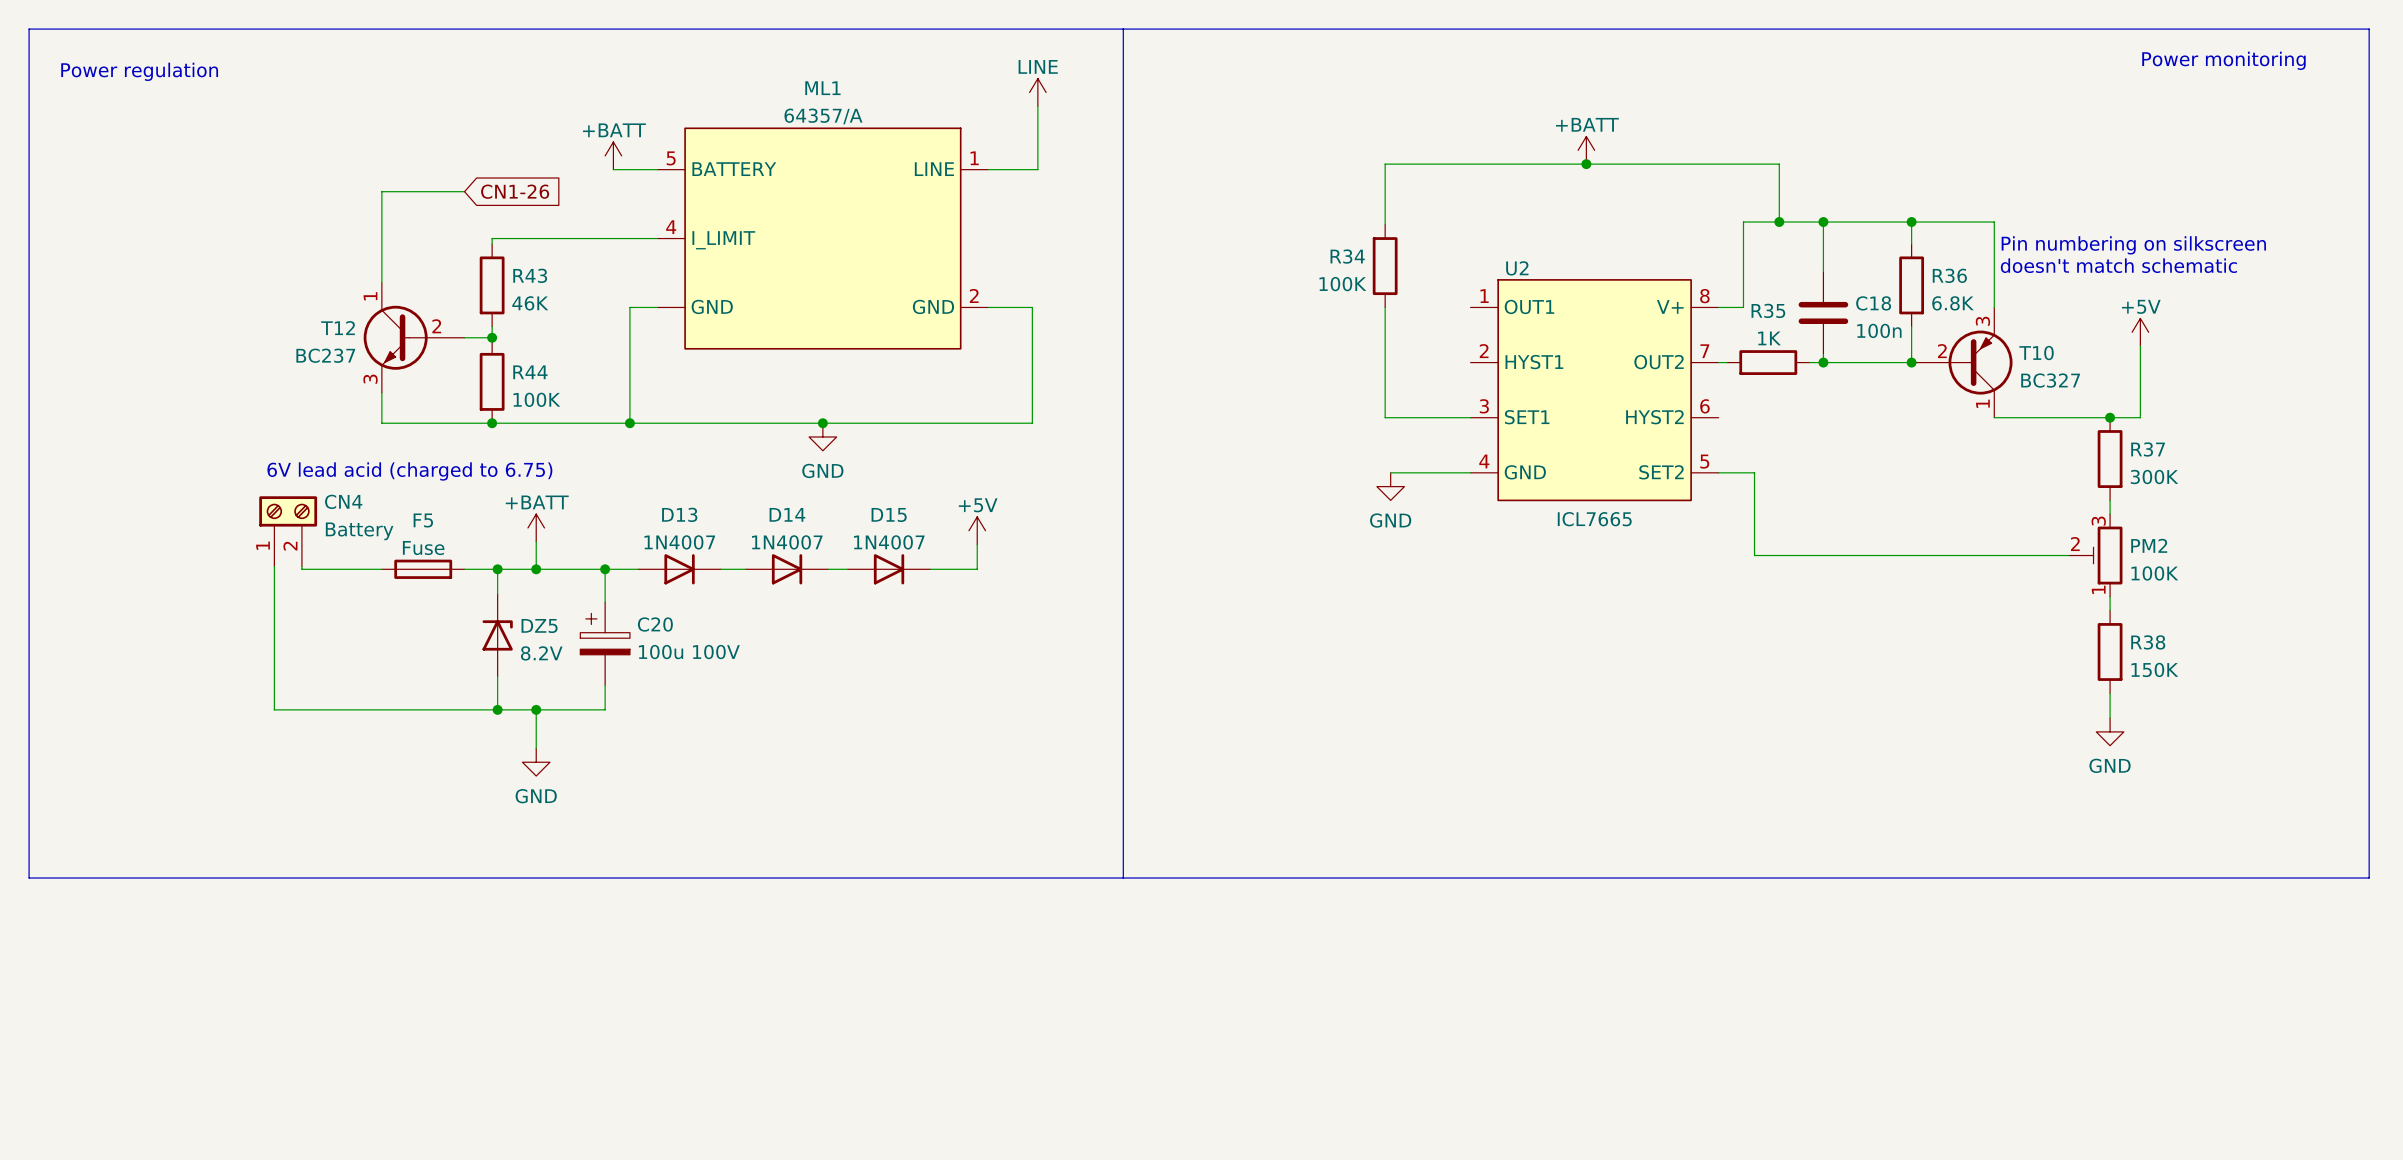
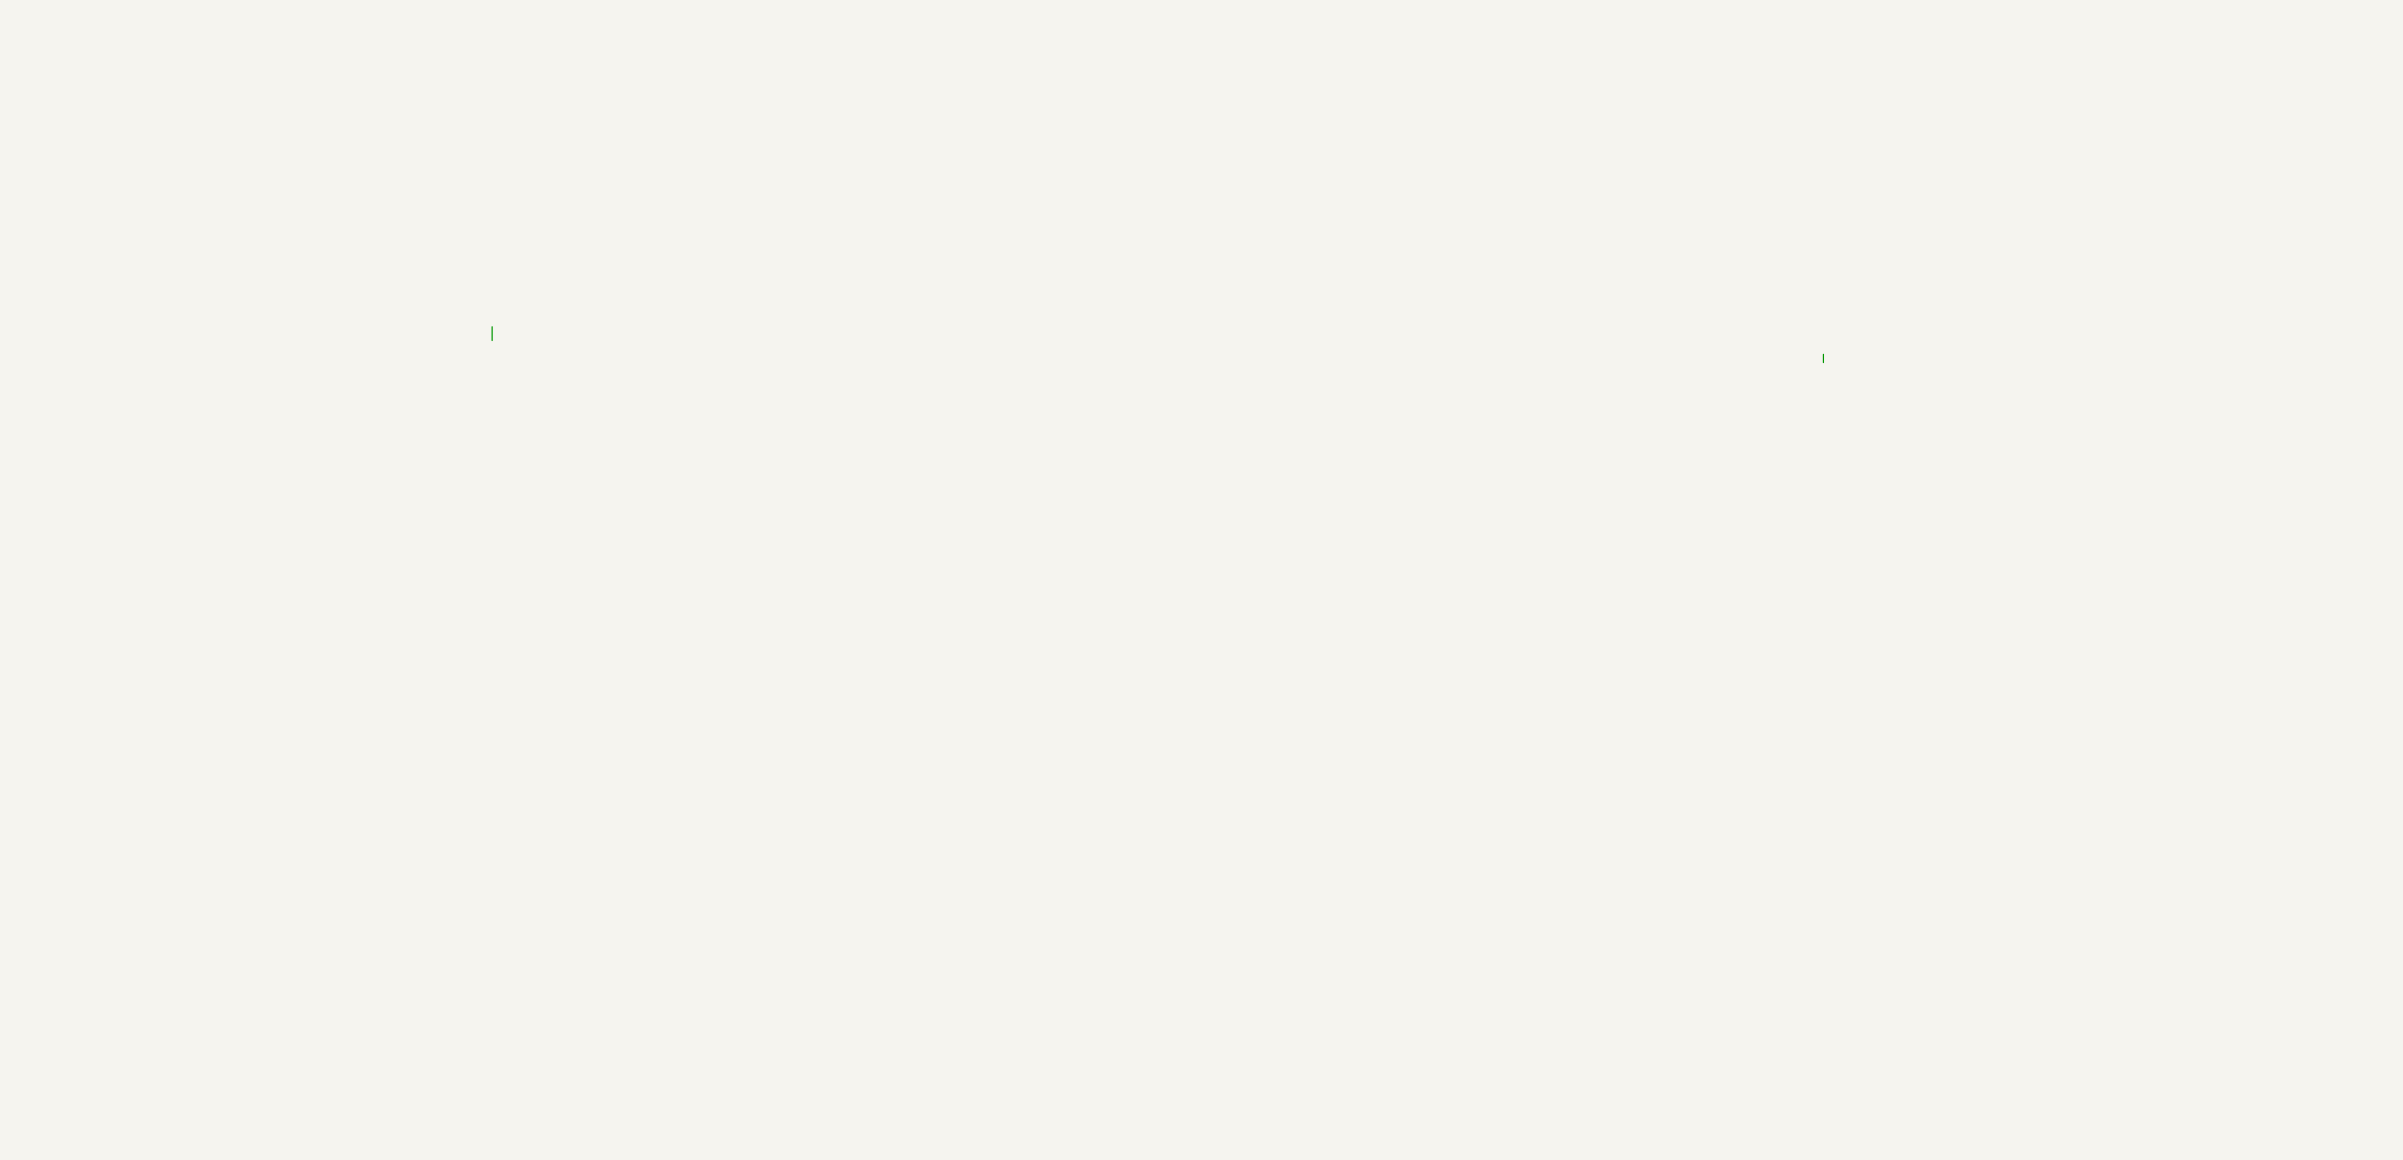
line: (29, 29) (2369, 29) (2369, 878) (29, 878) (29, 29) -> none
line: (1123, 29) (1123, 878) -> none
text: Power monitoring (2223, 60) -> none
text: Power regulation (139, 71) -> none
power symbol: LINE (1037, 92) -> none
wire: (1037, 106) (1037, 169) (988, 169) -> none
power symbol: +BATT (1586, 150) -> none
power symbol: +BATT (613, 155) -> none
junction: (1586, 164) -> none
wire: (613, 169) (657, 169) -> none
wire: (464, 191) (381, 191) (381, 282) -> none
global label: CN1-26 (515, 191) -> none
wire: (1779, 222) (1779, 164) (1385, 164) (1385, 224) -> none
junction: (1779, 222) -> none
wire: (1823, 222) (1823, 271) -> none
junction: (1823, 222) -> none
wire: (1911, 222) (1911, 244) -> none
junction: (1911, 222) -> none
wire: (657, 238) (492, 238) (492, 244) -> none
ML1: 64357/A (822, 238) -> none
text: Pin numbering on silkscreen (2133, 245) -> none
text: doesn't match schematic (2118, 265) -> none
R34: 100K (1385, 266) -> none
R43: 46K (492, 285) -> none
R36: 6.8K (1911, 285) -> none
wire: (657, 307) (629, 307) (629, 423) -> none
wire: (988, 307) (1032, 307) (1032, 423) (381, 423) (381, 392) -> none
wire: (1385, 307) (1385, 417) (1470, 417) -> none
wire: (1718, 307) (1743, 307) (1743, 222) (1994, 222) (1994, 307) -> none
C18: 100n (1823, 312) -> none
wire: (1911, 326) (1911, 362) (1809, 362) -> none
power symbol: +5V (2140, 332) -> none
T12: BC237 (414, 337) -> none
wire: (464, 337) (492, 337) -> none
junction: (492, 337) -> none
wire: (2140, 346) (2140, 417) (1994, 417) -> none
wire: (1718, 362) (1726, 362) -> none
R35: 1K (1768, 362) -> none
junction: (1823, 362) -> none
junction: (1911, 362) -> none
T10: BC327 (1962, 362) -> none
R44: 100K (492, 381) -> none
U2: ICL7665 (1594, 390) -> none
junction: (2110, 417) -> none
junction: (492, 423) -> none
junction: (629, 423) -> none
junction: (822, 423) -> none
power symbol: GND (822, 437) -> none
R37: 300K (2110, 459) -> none
text: 6V lead acid (charged to 6.75) (409, 471) -> none
wire: (1390, 472) (1470, 472) -> none
wire: (1718, 472) (1754, 472) (1754, 555) (2068, 555) -> none
power symbol: GND (1390, 486) -> none
wire: (2110, 500) (2110, 514) -> none
power symbol: +BATT (536, 527) -> none
power symbol: +5V (977, 530) -> none
CN4: Battery (288, 531) -> none
wire: (536, 541) (536, 569) -> none
wire: (977, 544) (977, 569) (930, 569) -> none
PM2: 100K (2095, 555) -> none
wire: (274, 566) (274, 709) (605, 709) (605, 685) -> none
wire: (301, 566) (301, 569) (381, 569) -> none
F5: Fuse (423, 569) -> none
wire: (464, 569) (638, 569) -> none
wire: (497, 569) (497, 594) -> none
junction: (497, 569) -> none
junction: (536, 569) -> none
wire: (605, 569) (605, 602) -> none
junction: (605, 569) -> none
D13: 1N4007 (679, 569) -> none
wire: (720, 569) (745, 569) -> none
D14: 1N4007 (787, 569) -> none
wire: (828, 569) (847, 569) -> none
D15: 1N4007 (889, 569) -> none
wire: (2110, 596) (2110, 610) -> none
DZ5: 8.2V (497, 635) -> none
C20: 100u 100V (605, 643) -> none
R38: 150K (2110, 651) -> none
wire: (497, 676) (497, 709) -> none
wire: (2110, 693) (2110, 718) -> none
junction: (497, 709) -> none
wire: (536, 709) (536, 748) -> none
junction: (536, 709) -> none
power symbol: GND (2110, 731) -> none
power symbol: GND (536, 762) -> none

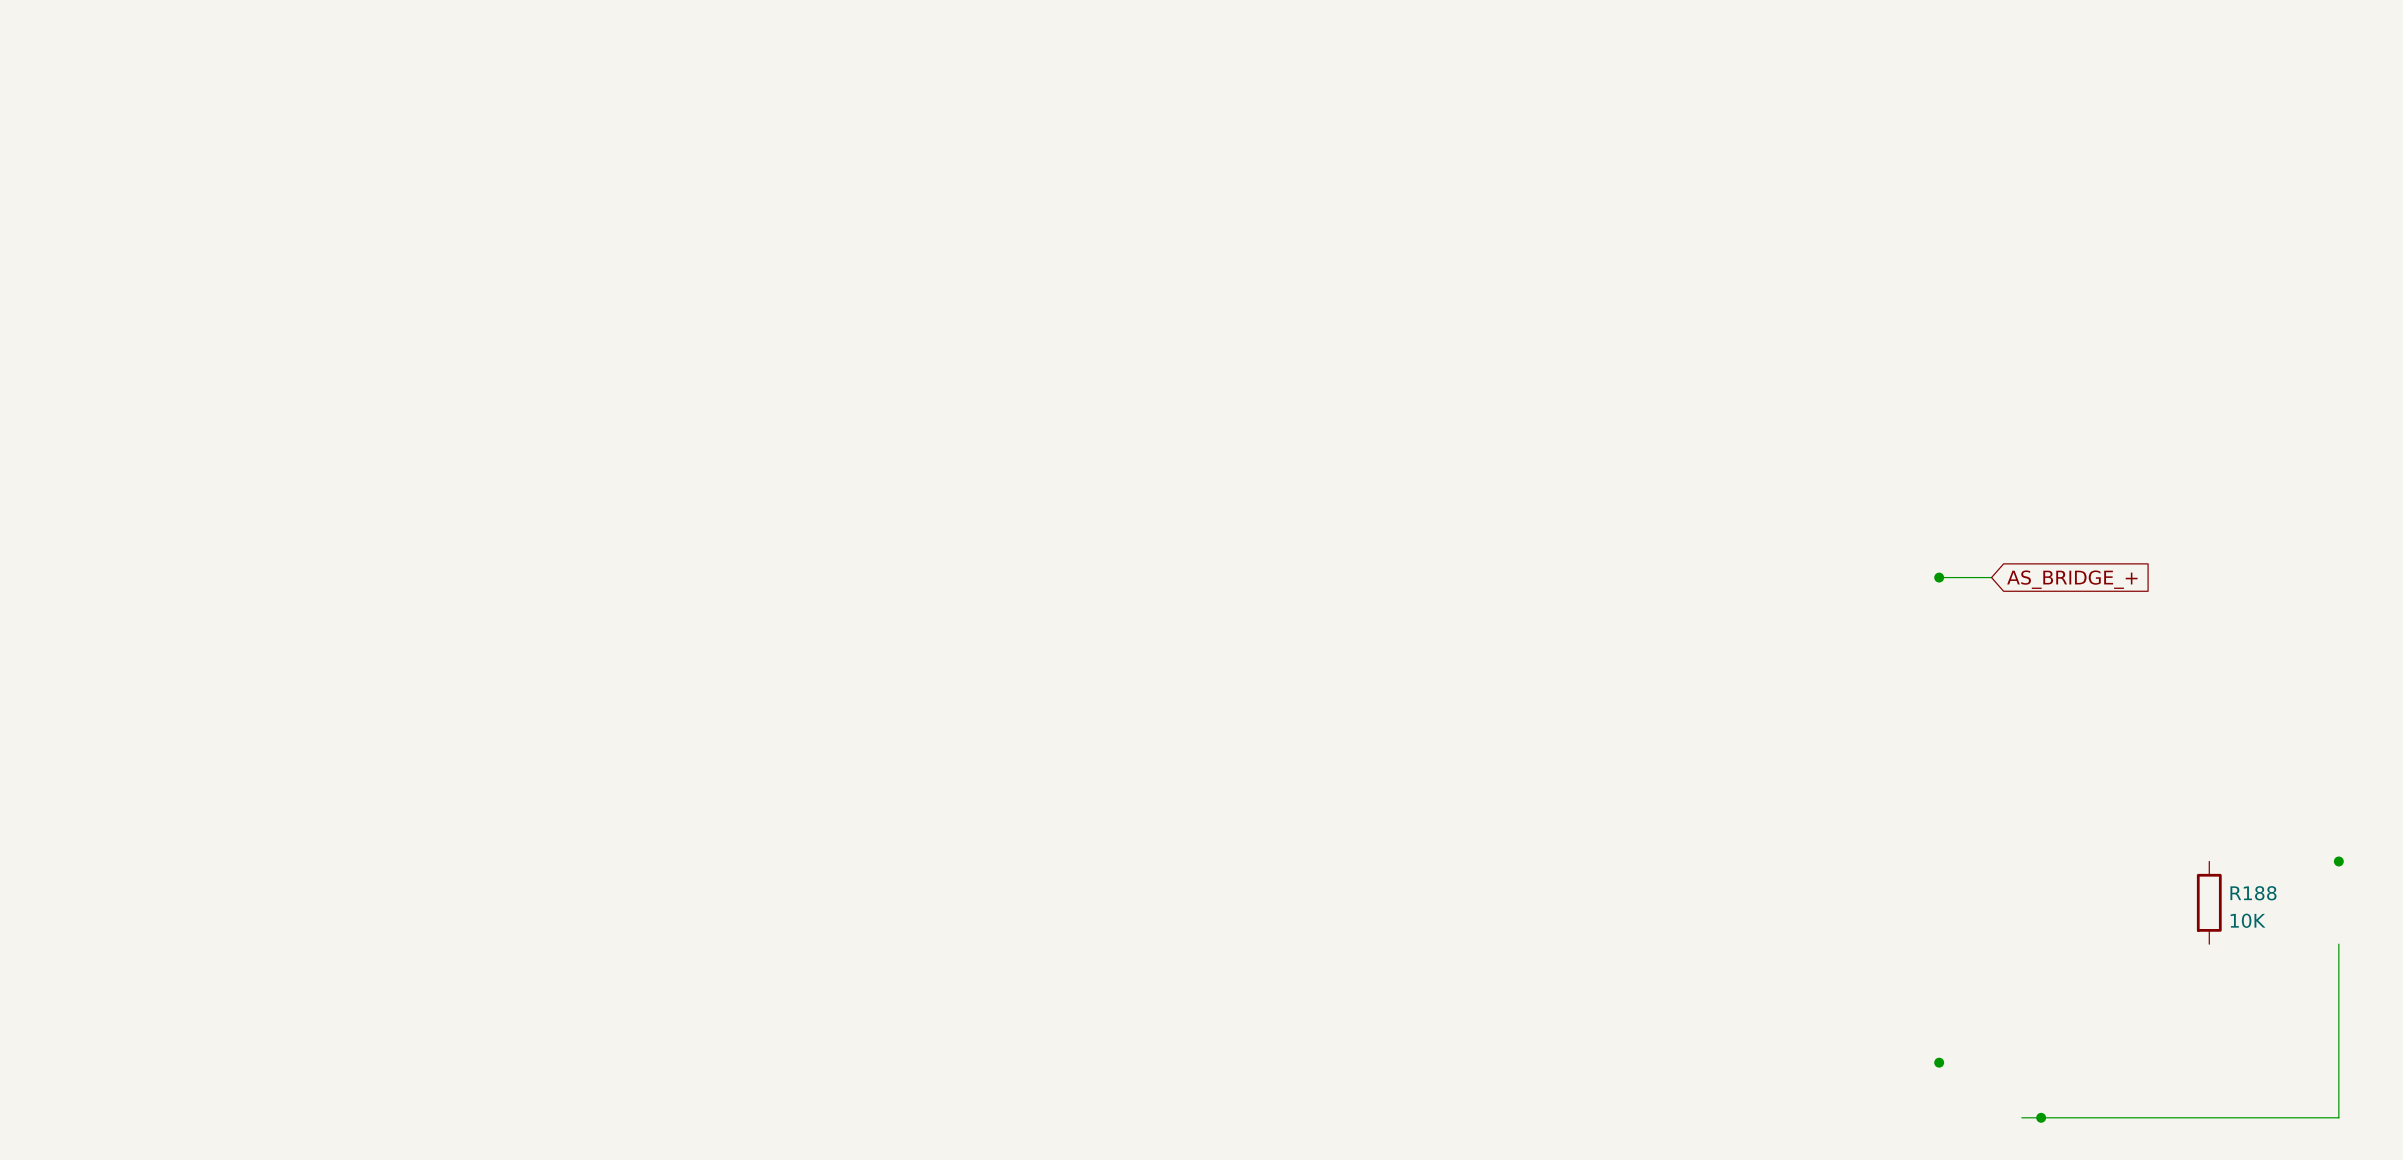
wire: (492, 326) (492, 340) -> none
wire: (1823, 354) (1823, 362) -> none
wire: none -> (1939, 577) (1991, 577)
junction: none -> (1939, 577)
global label: none -> AS_BRIDGE_+ (2072, 579)
junction: none -> (2338, 861)
R188: none -> 10K (2209, 902)
wire: none -> (2338, 944) (2338, 1117) (2021, 1117)
junction: none -> (1939, 1062)
junction: none -> (2041, 1117)

